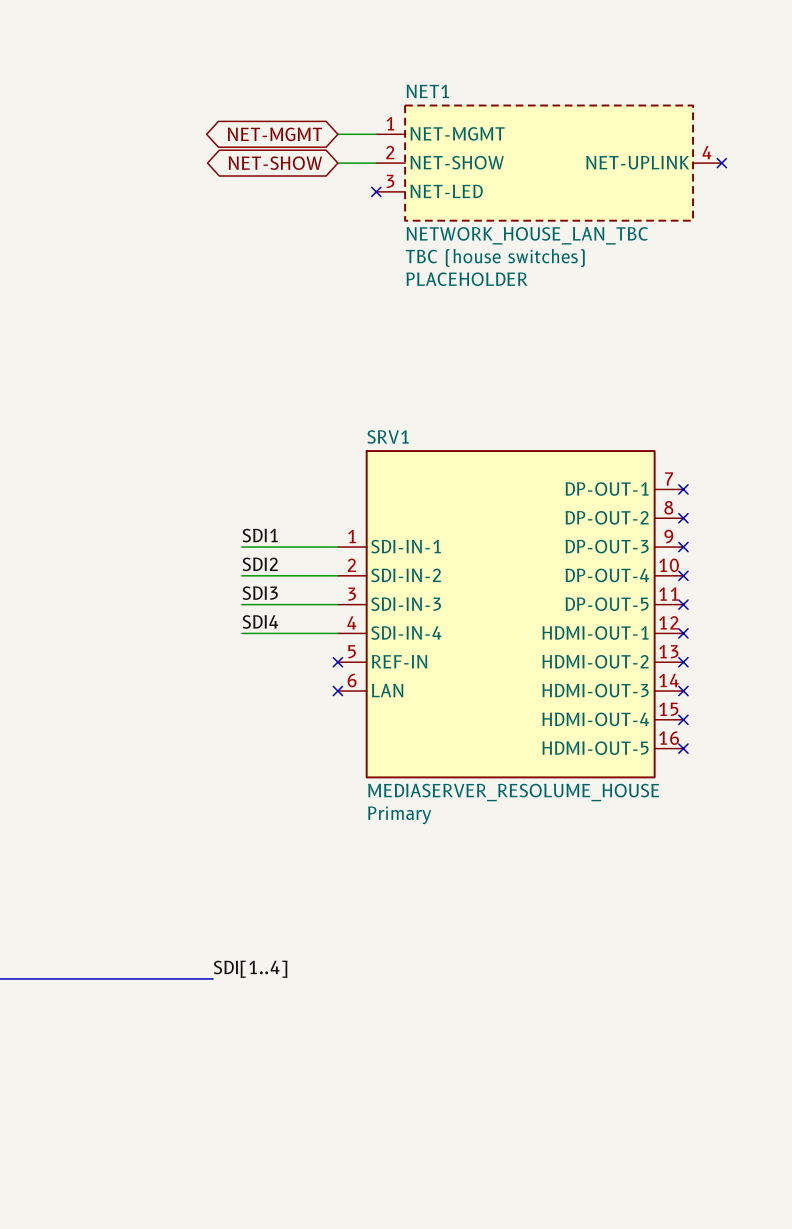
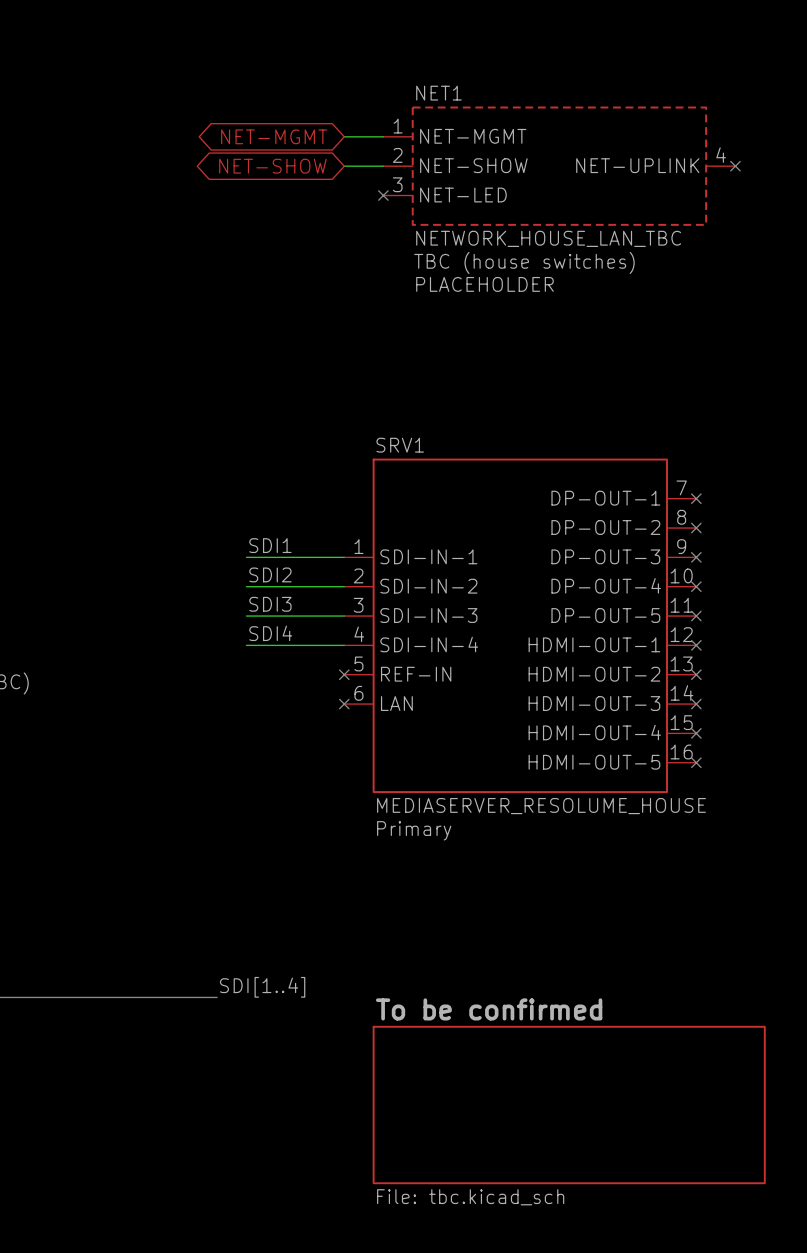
sheet To be confirmed: none -> File: tbc.kicad_sch (569, 1105)

